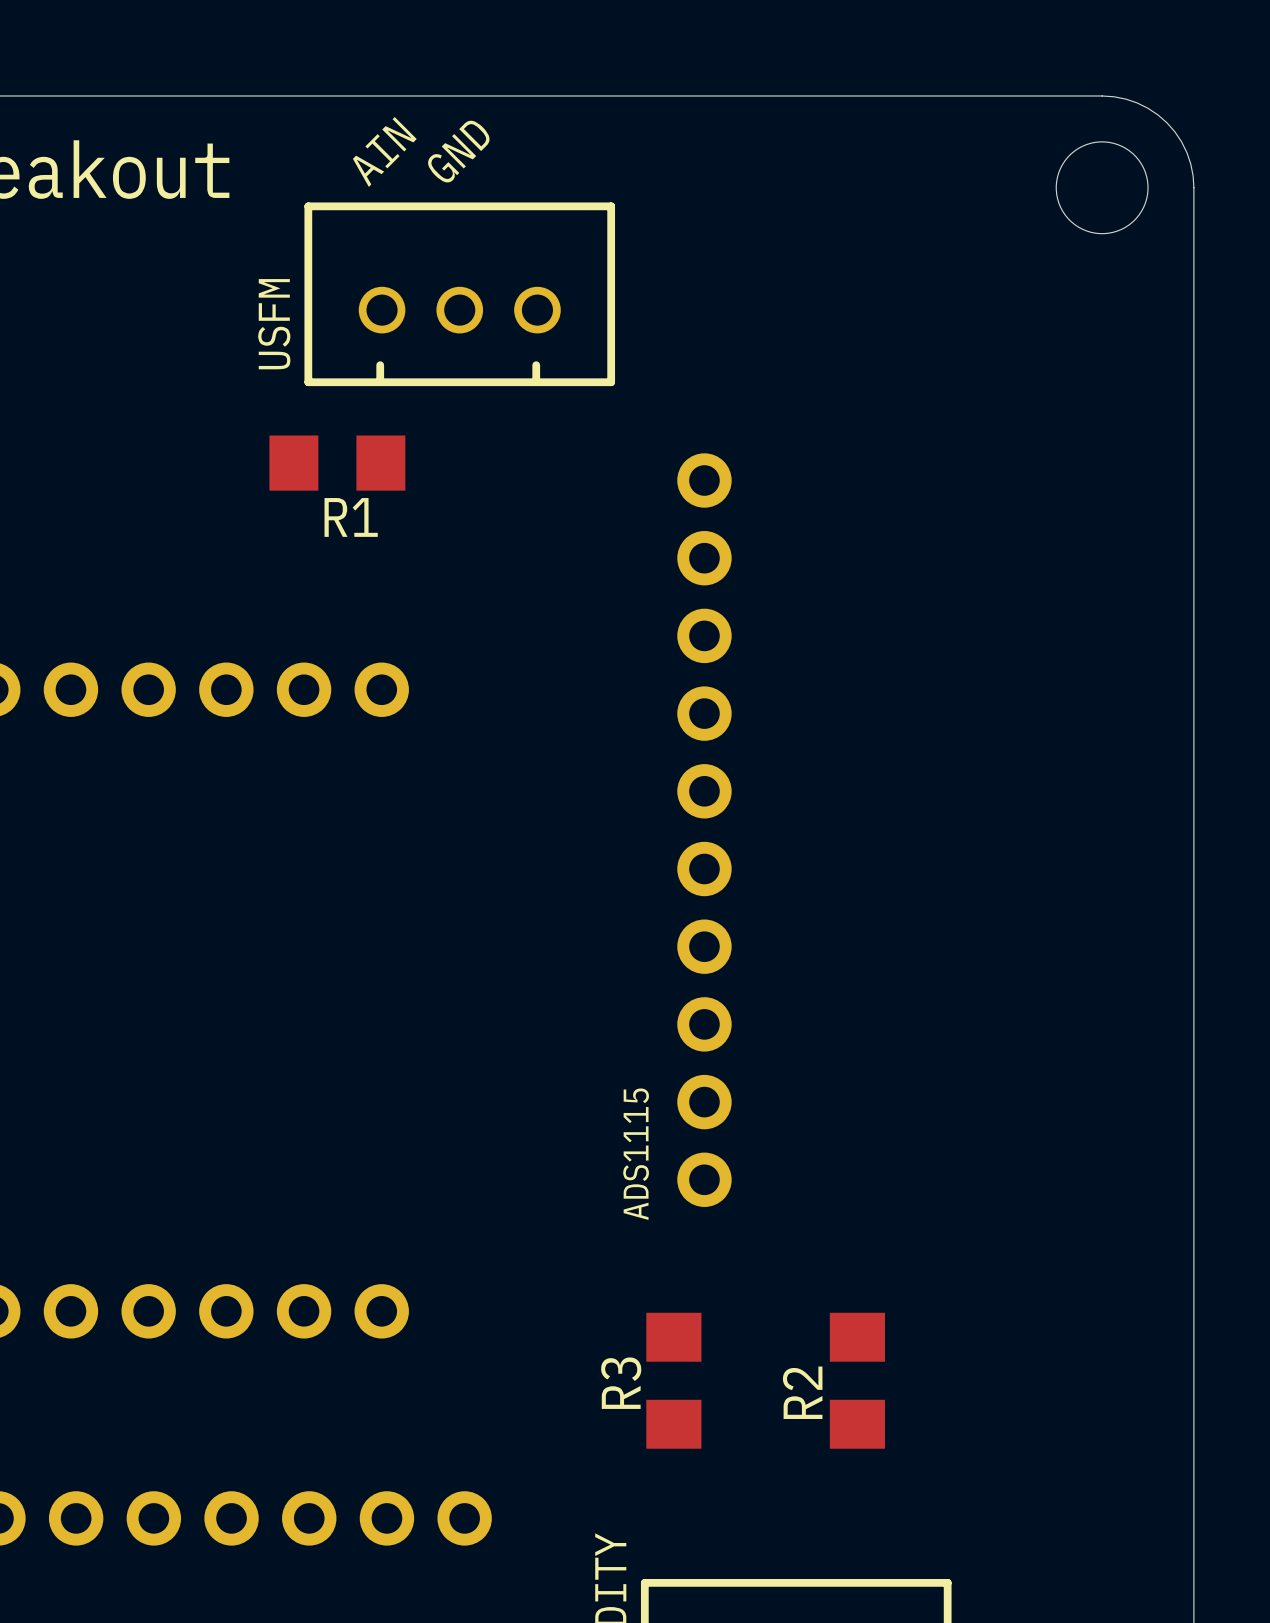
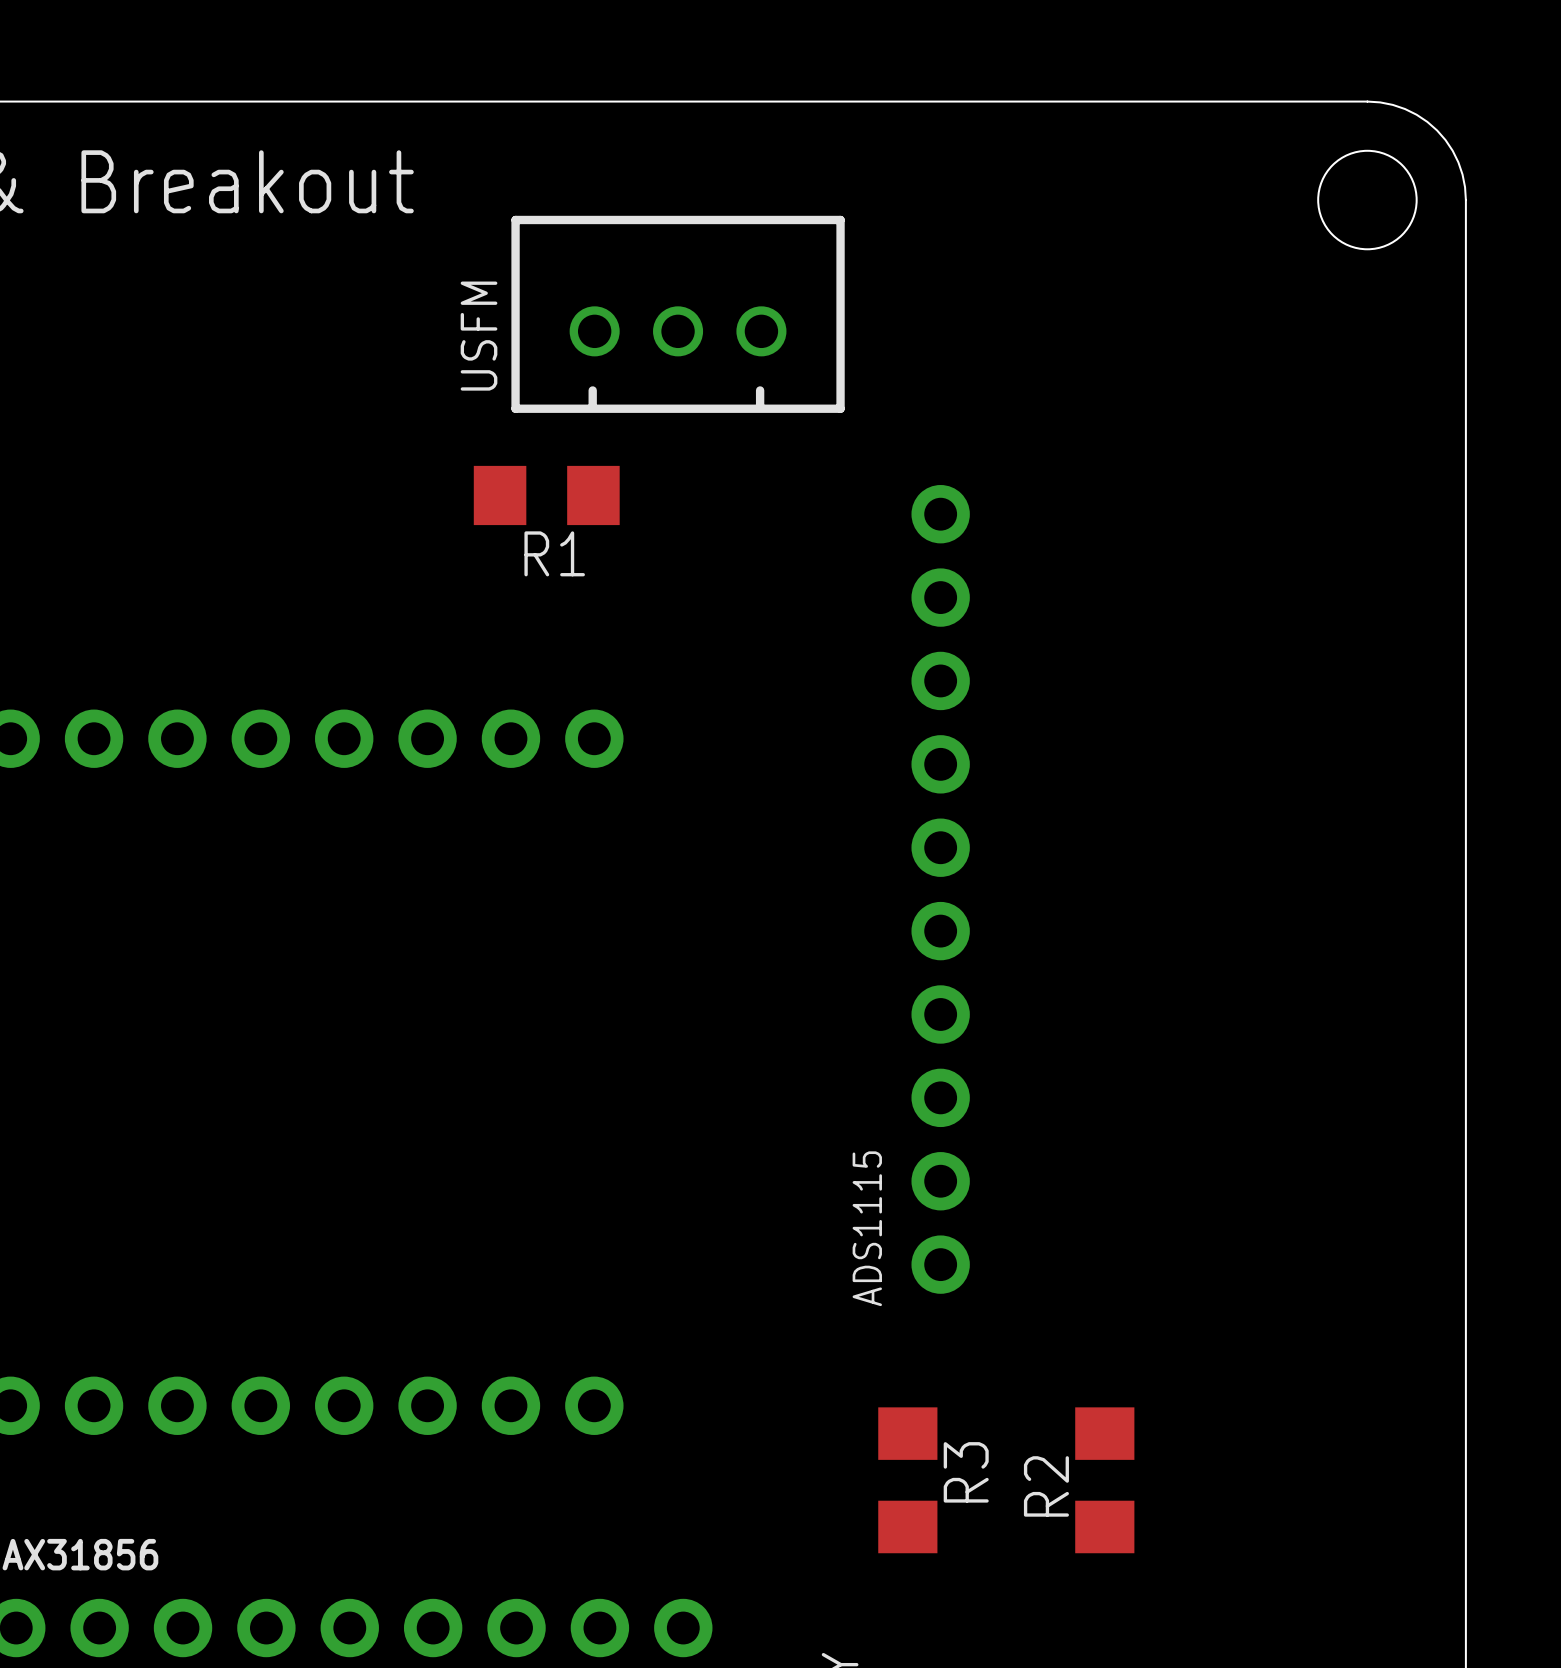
text: AIN (384, 151) -> none
text: GND (458, 151) -> none
R3 name position: R3 (621, 1383) -> R3 (966, 1472)

